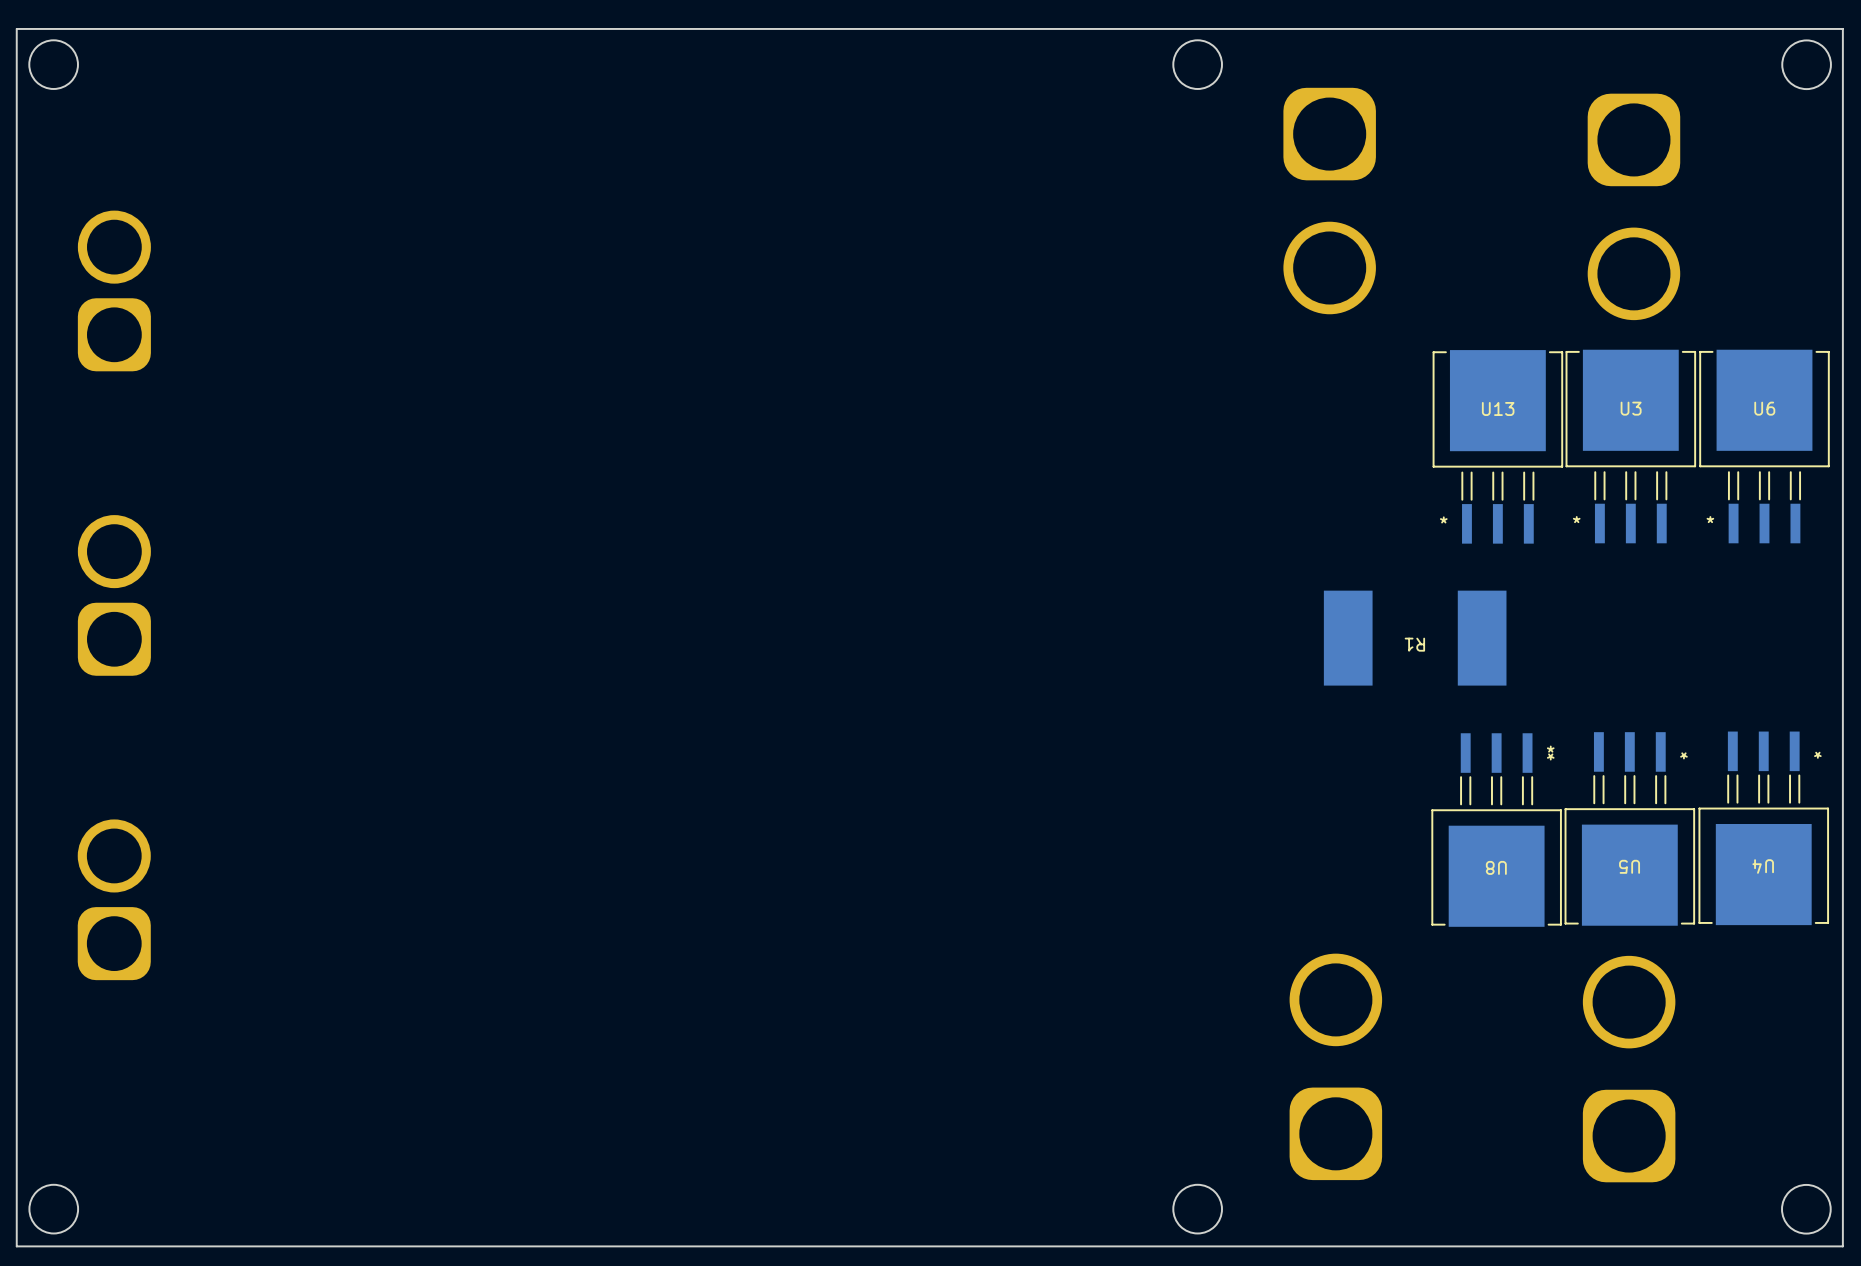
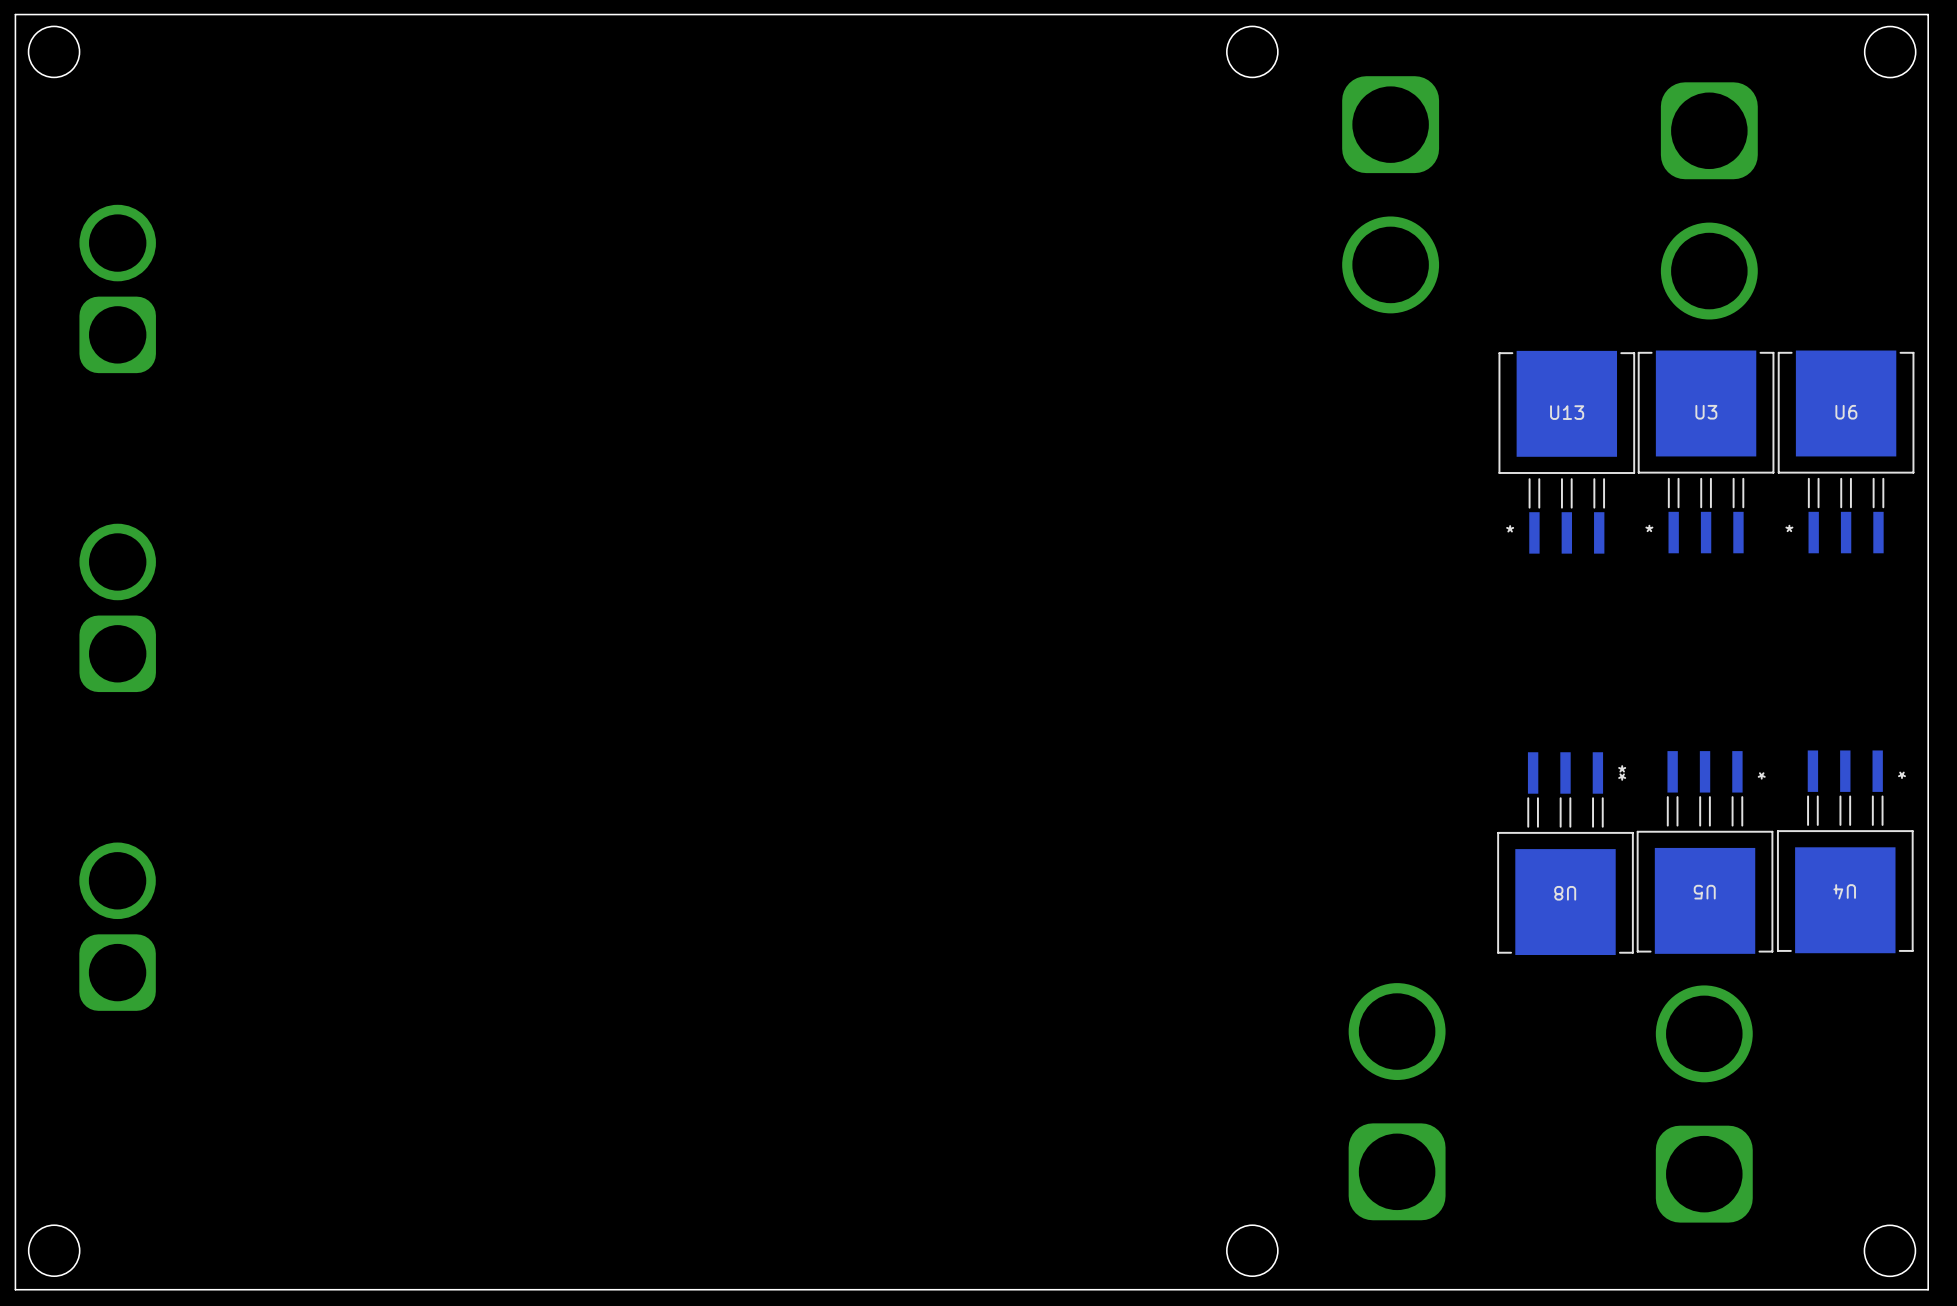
R1: (1415, 638) -> none

